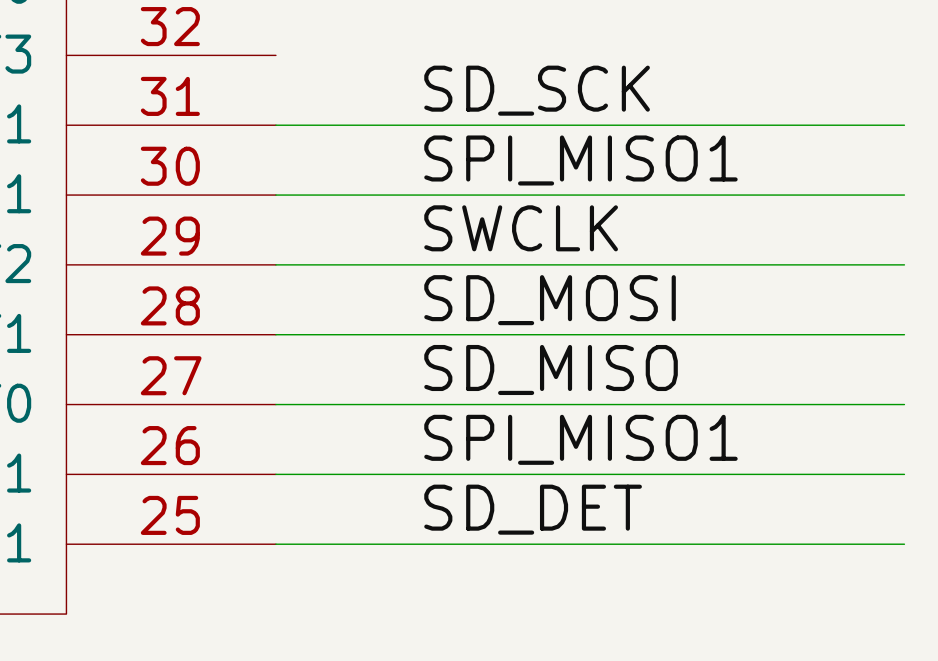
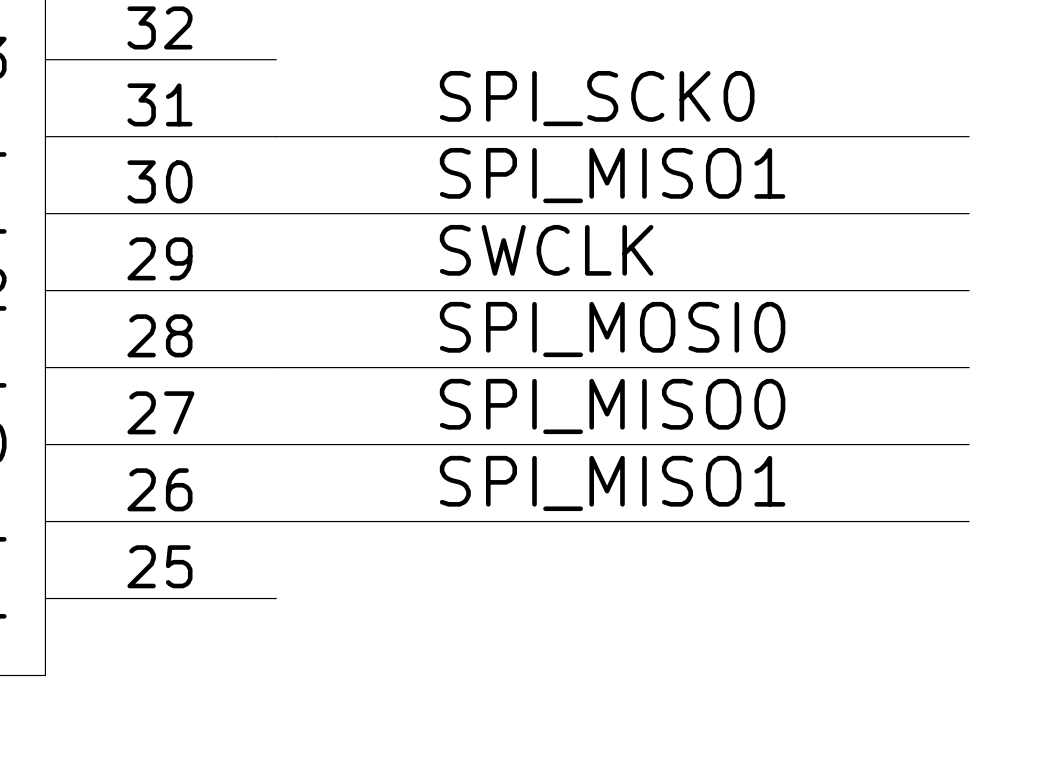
label: SD_SCK (537, 90) -> SPI_SCK0 (597, 98)
label: SD_MOSI (550, 300) -> SPI_MOSI0 (612, 329)
label: SD_MISO (551, 369) -> SPI_MISO0 (612, 406)
label: SD_DET (533, 509) -> none
wire: (275, 544) (904, 544) -> none

